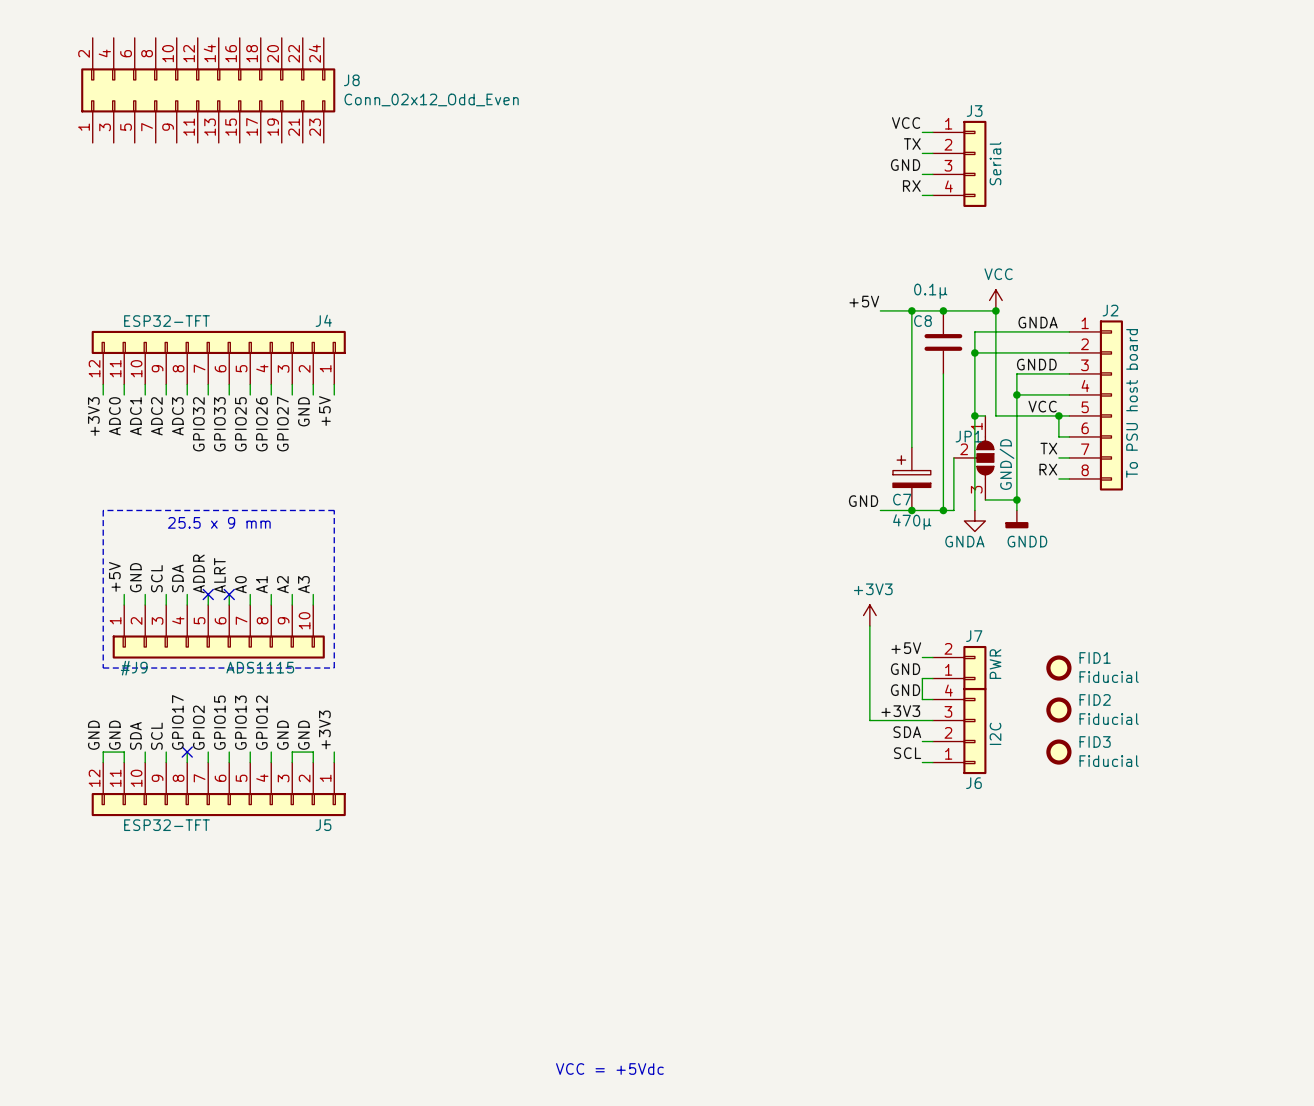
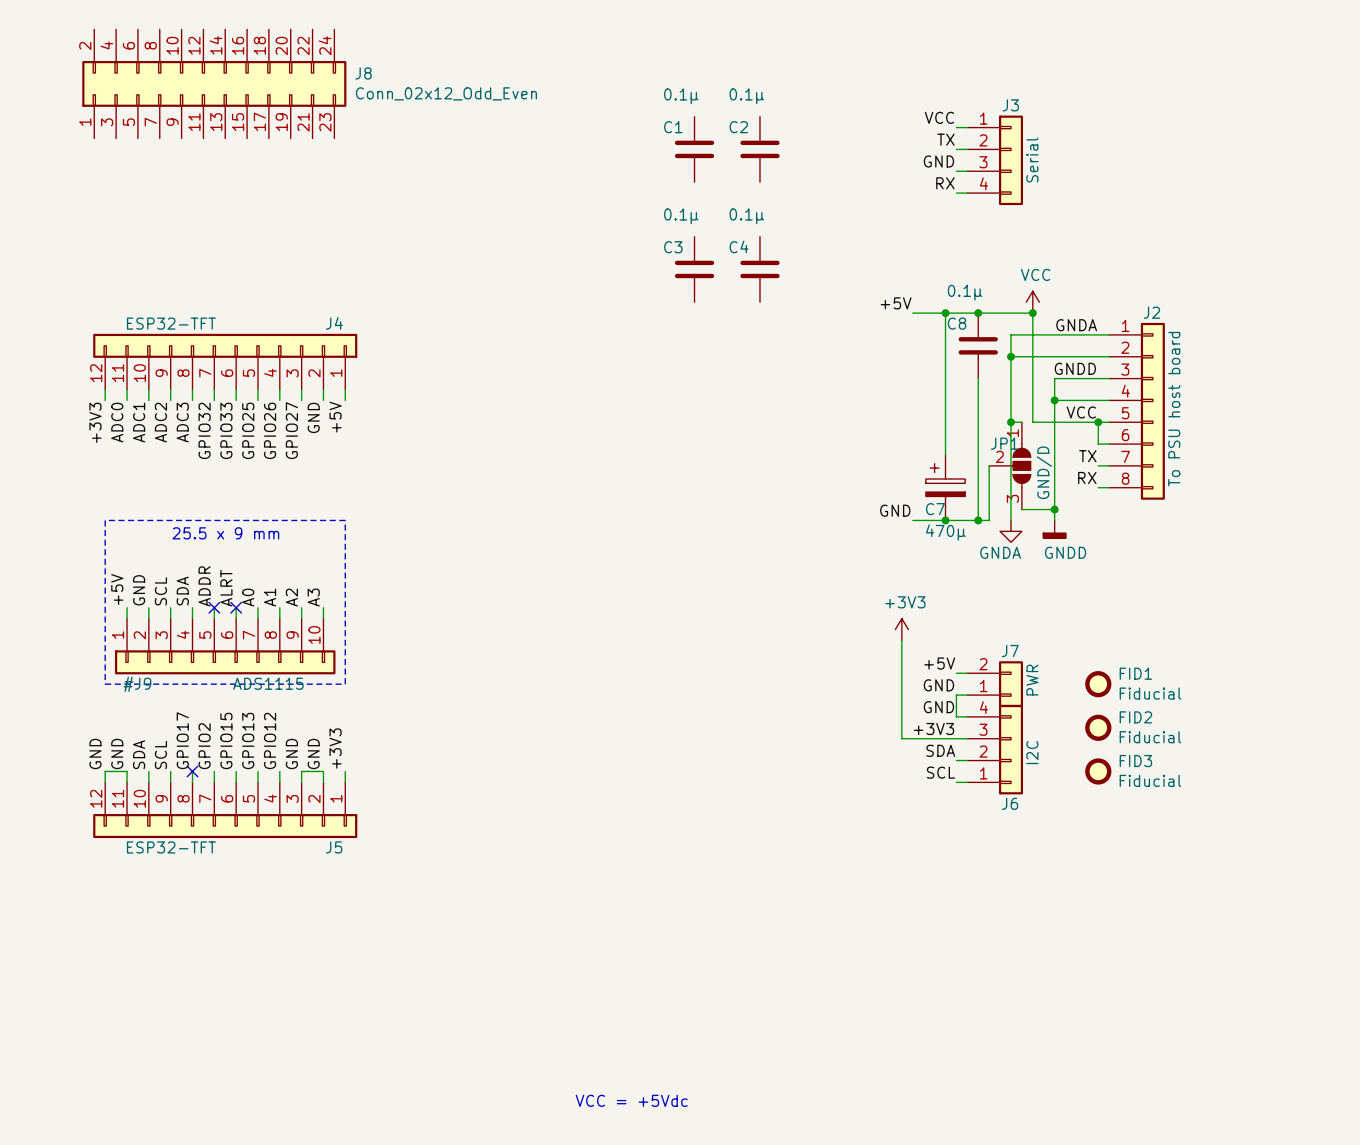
C1: none -> 0.1µ (694, 149)
C2: none -> 0.1µ (759, 149)
C3: none -> 0.1µ (694, 269)
C4: none -> 0.1µ (759, 269)

